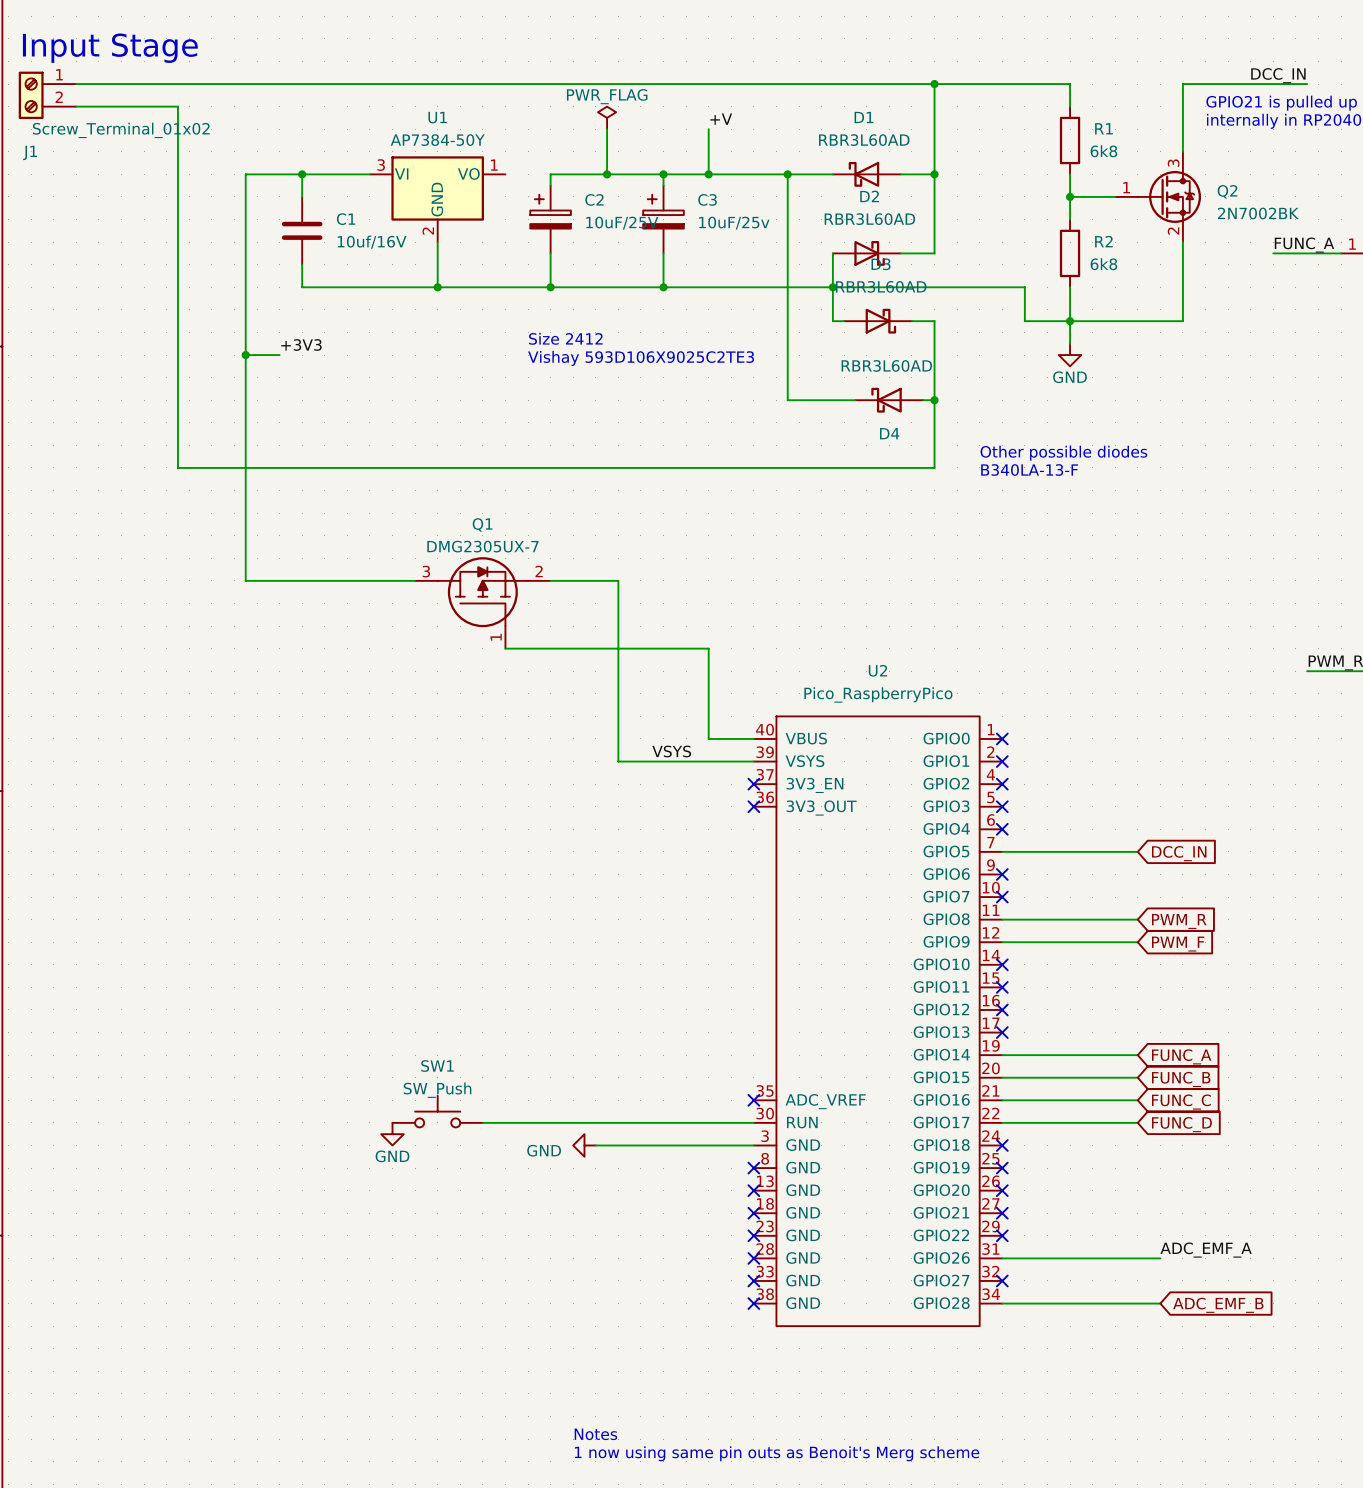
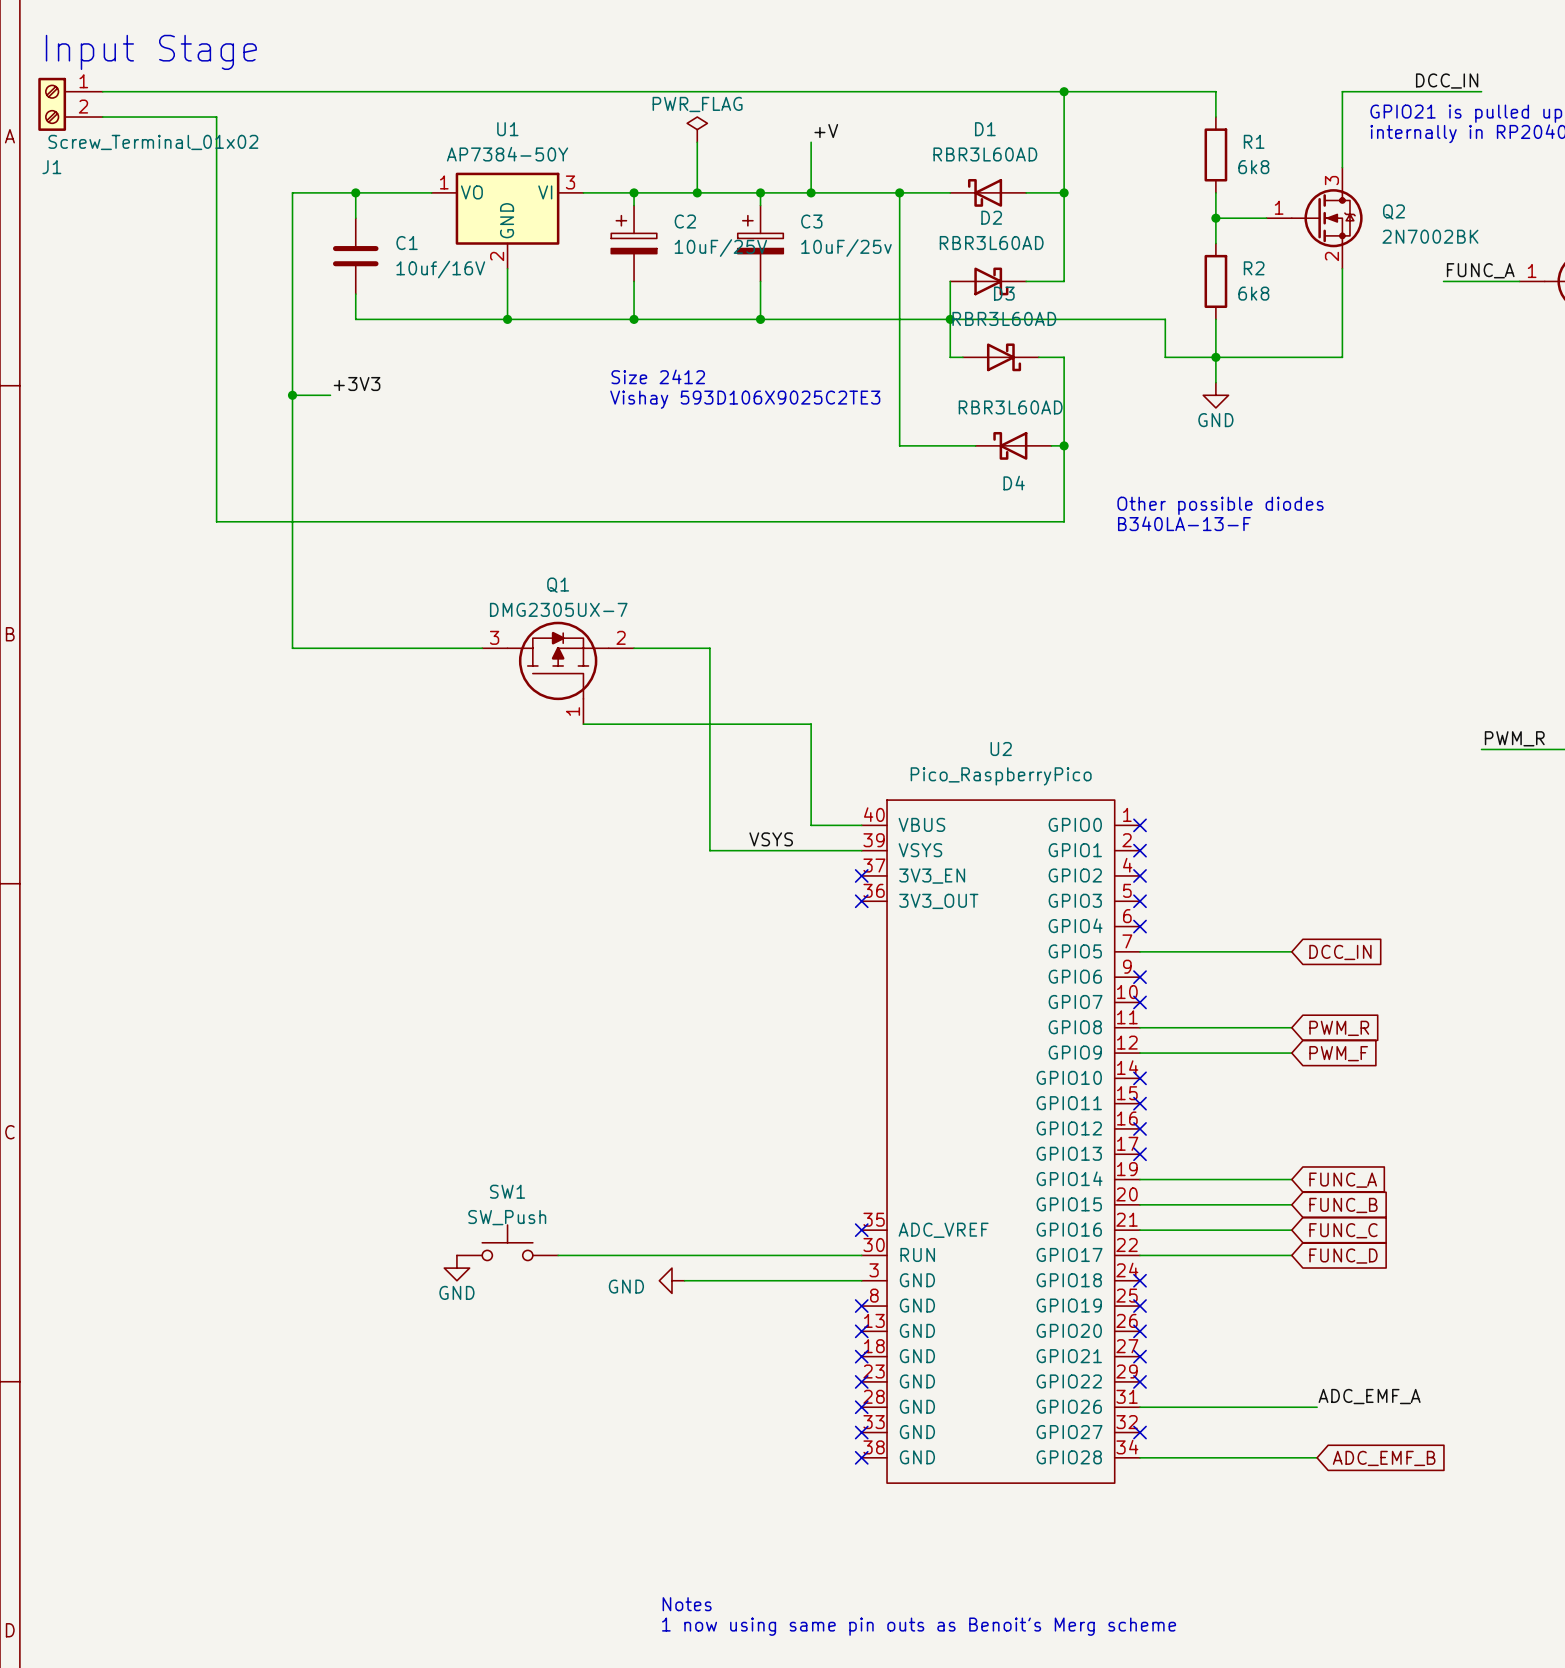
wire: none -> (583, 192) (634, 192)
junction: none -> (634, 192)
U1 flip: as is (437, 188) -> left-right (507, 208)

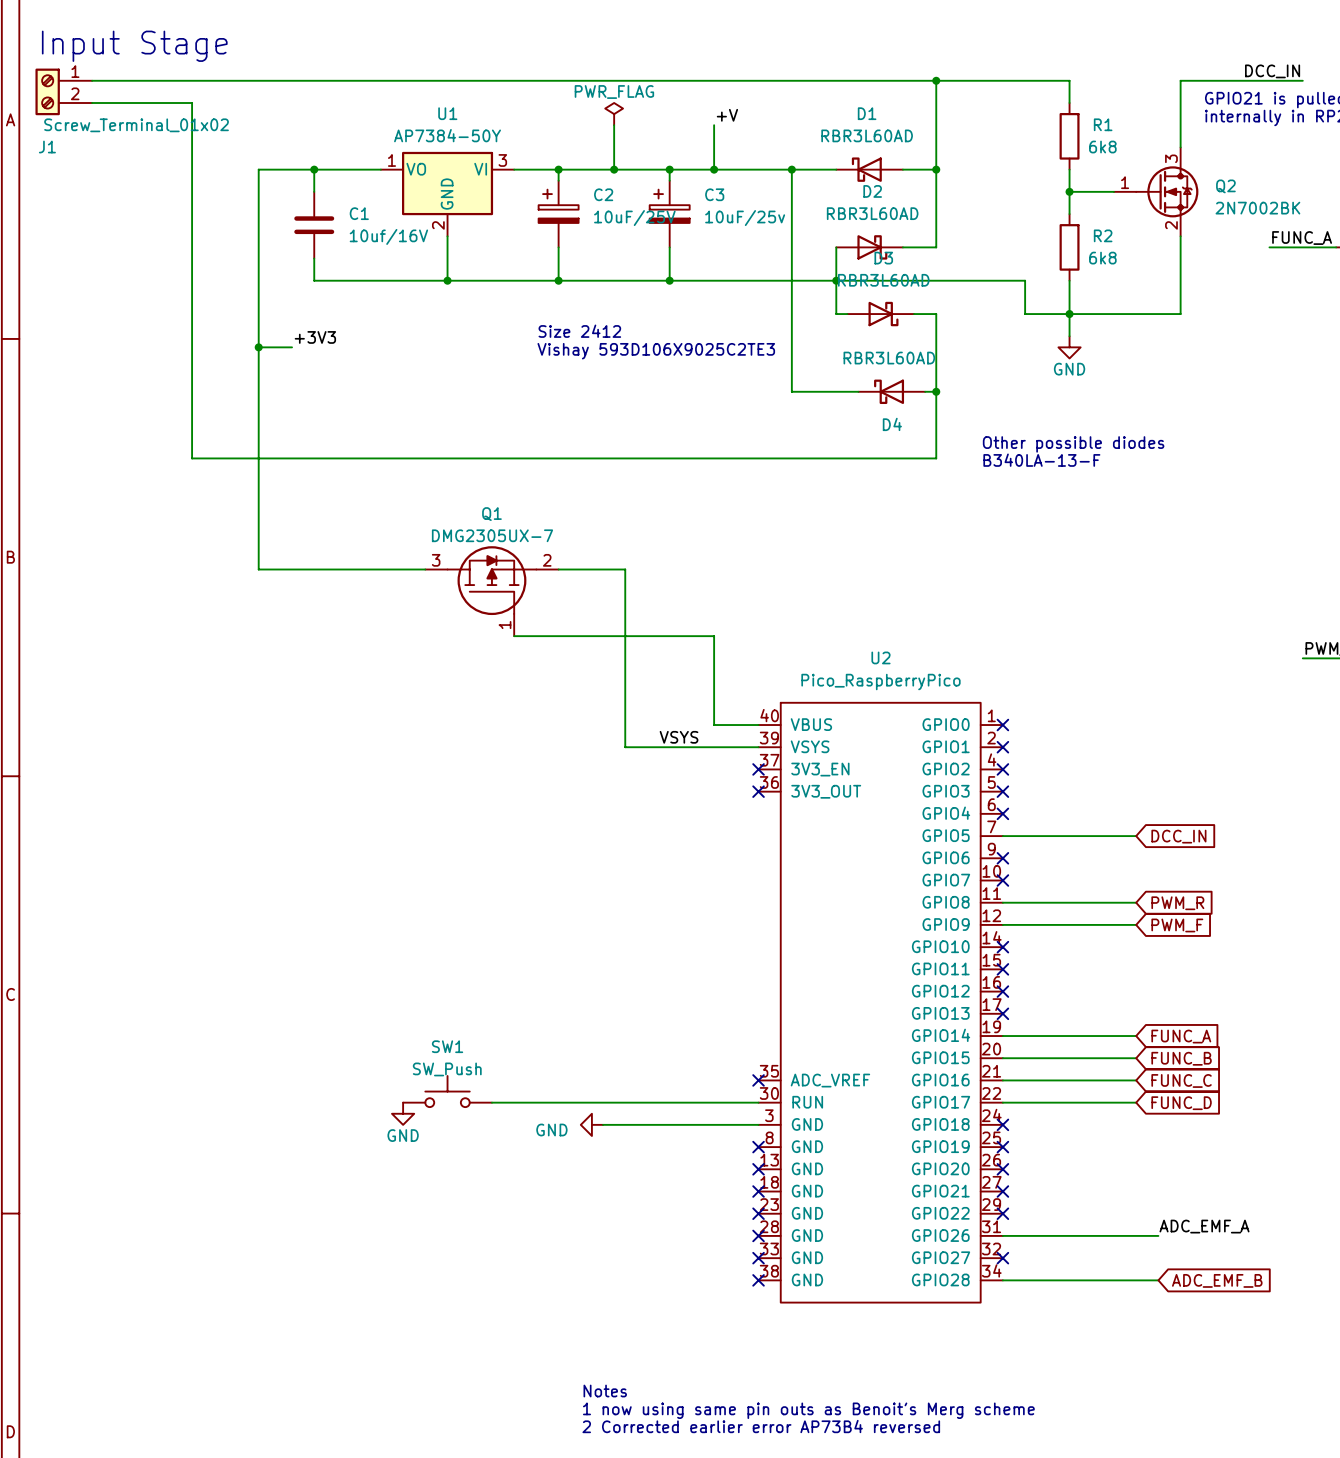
text: none -> Notes (605, 1391)
text: Notes (687, 1604) -> 1 now using same pin outs as Benoit's Merg scheme (808, 1410)
text: 1 now using same pin outs as Benoit's Merg scheme (919, 1626) -> 2 Corrected earlier error AP73B4 reversed (761, 1426)

